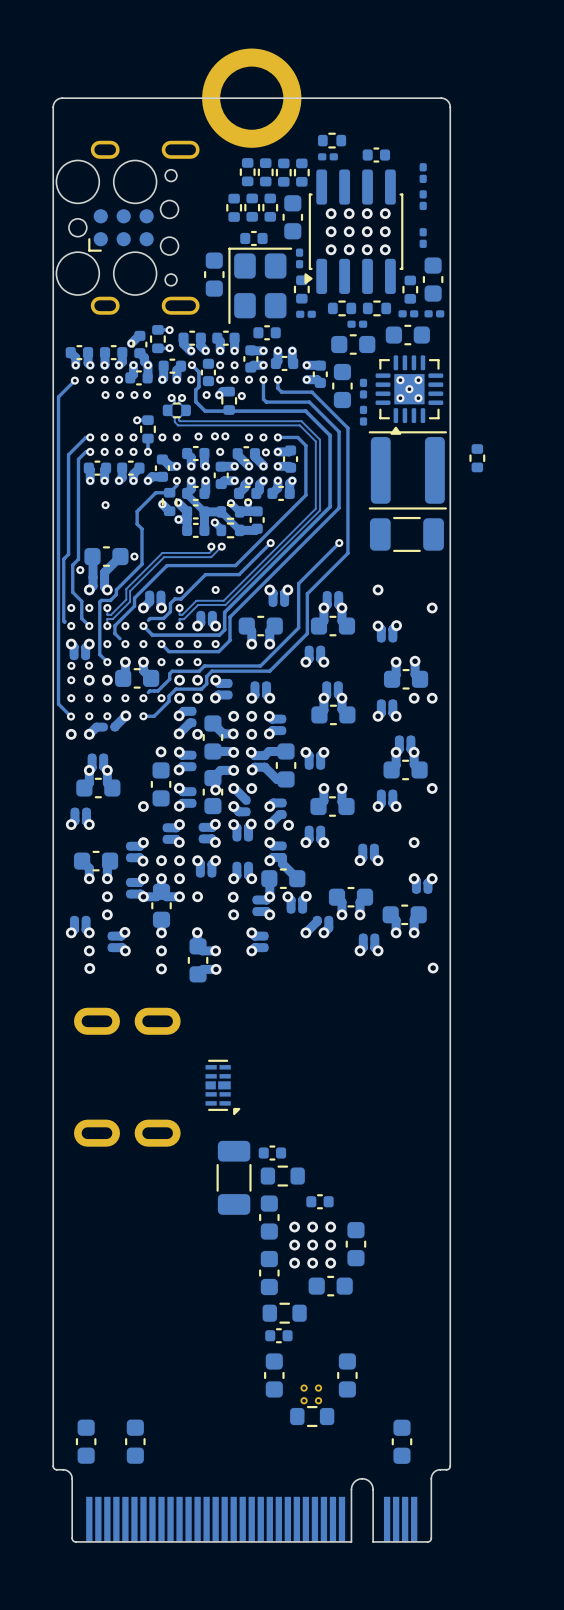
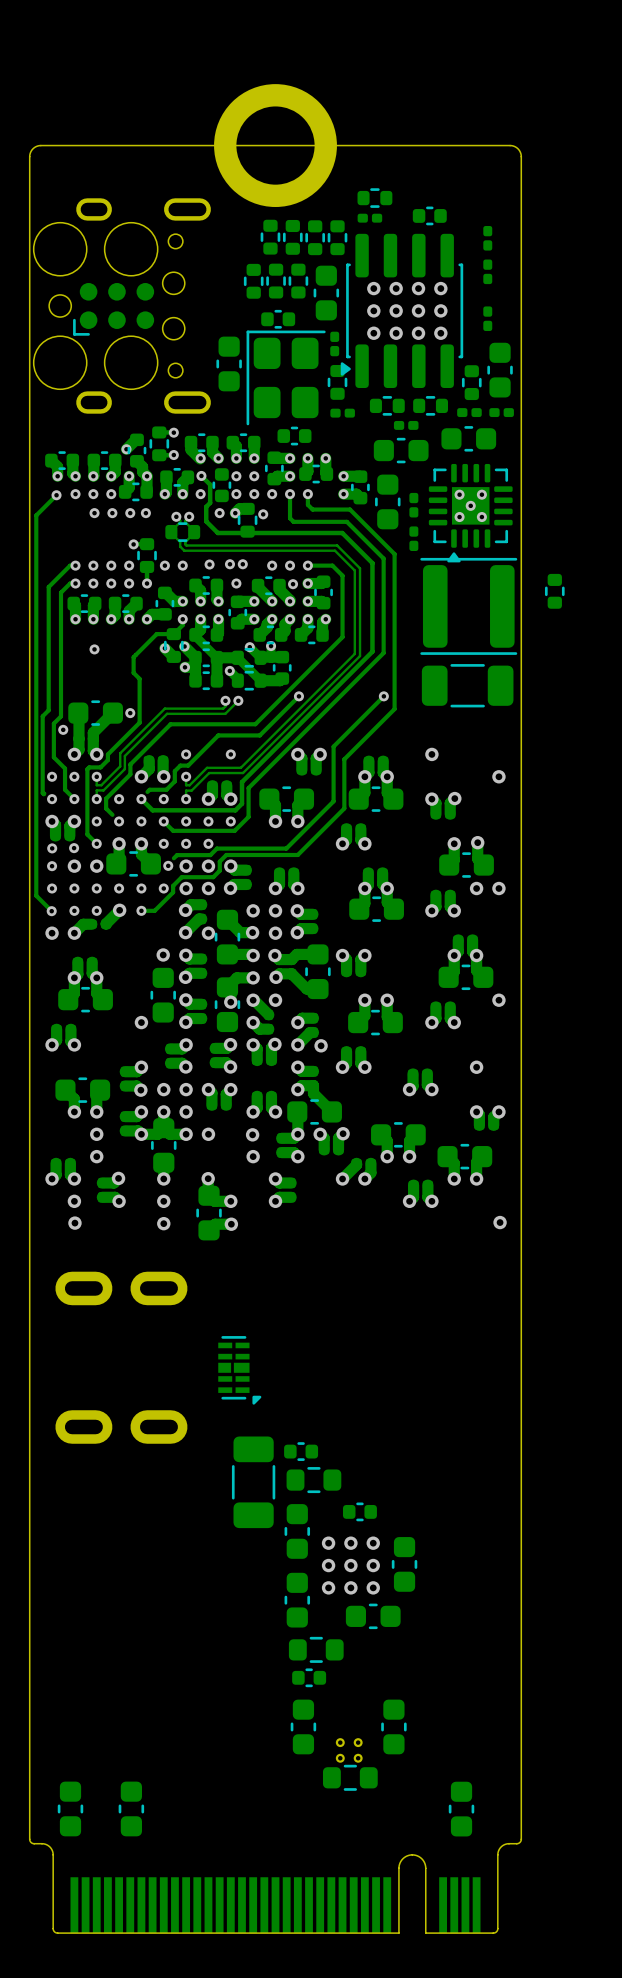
track: (169, 673) (169, 679) (157, 691) (148, 692) -> none
via: none -> (168, 865)

